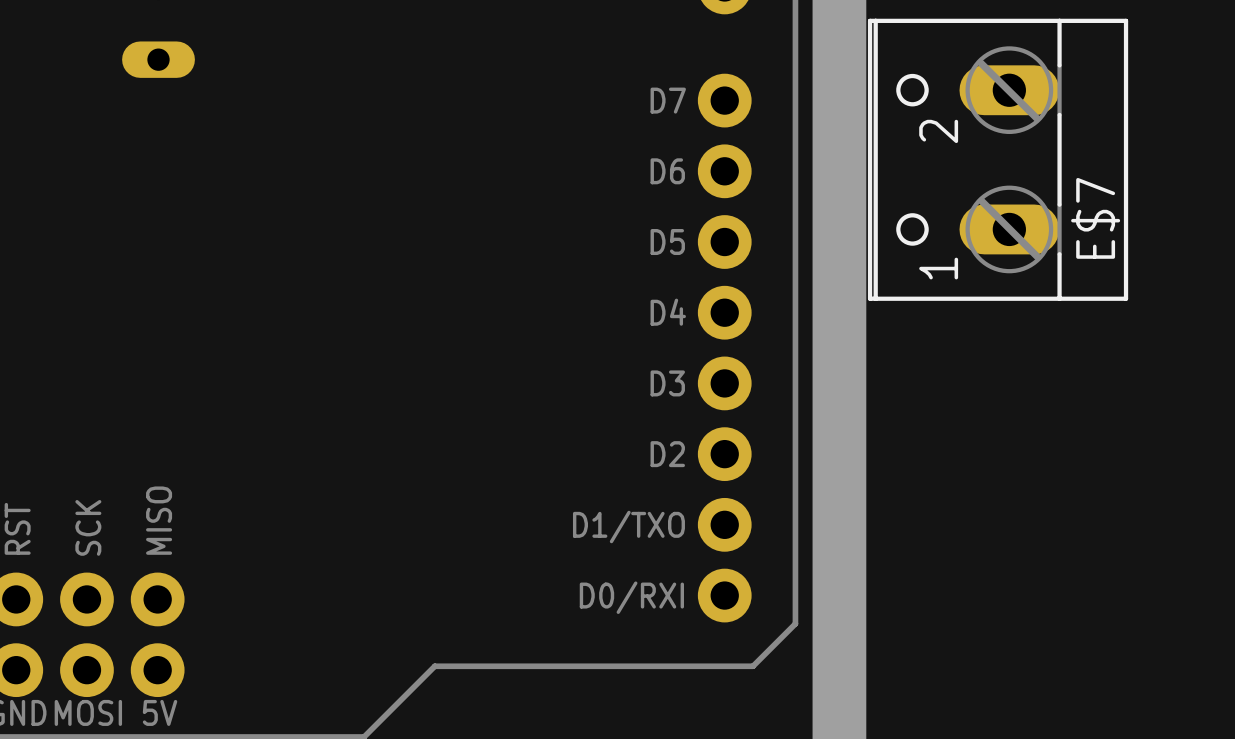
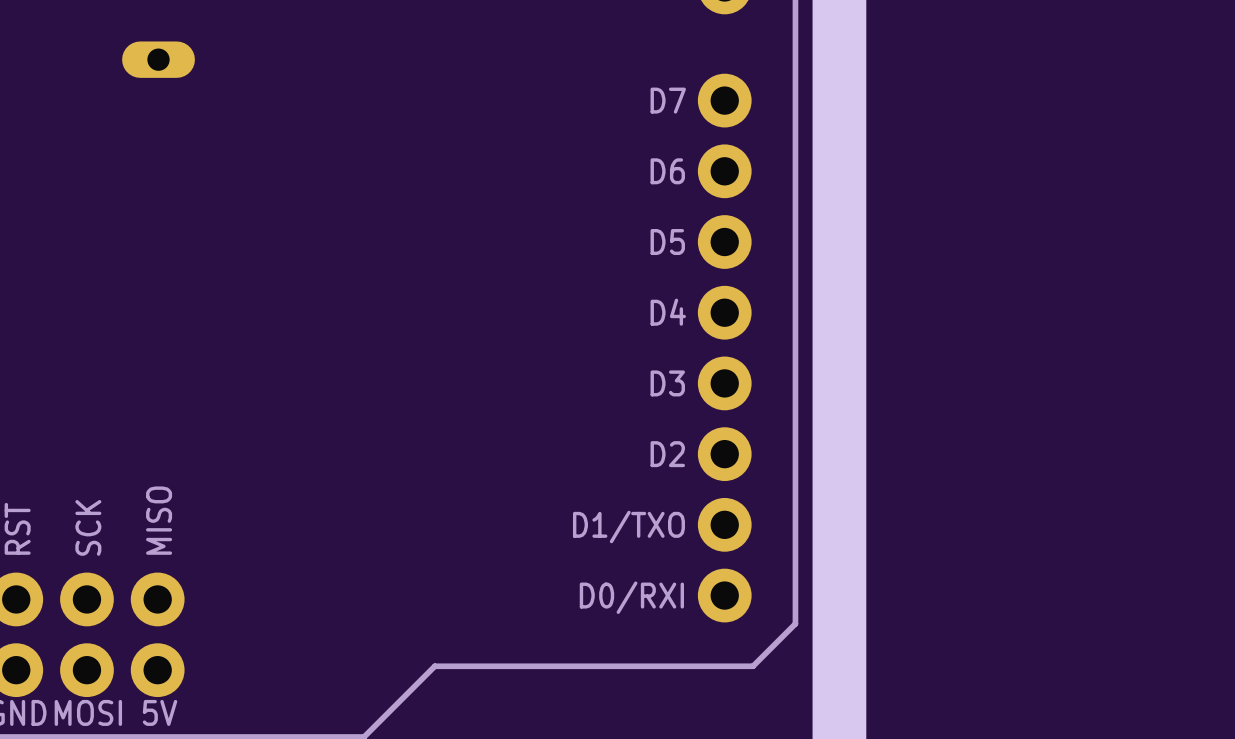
E$7: (998, 159) -> none

